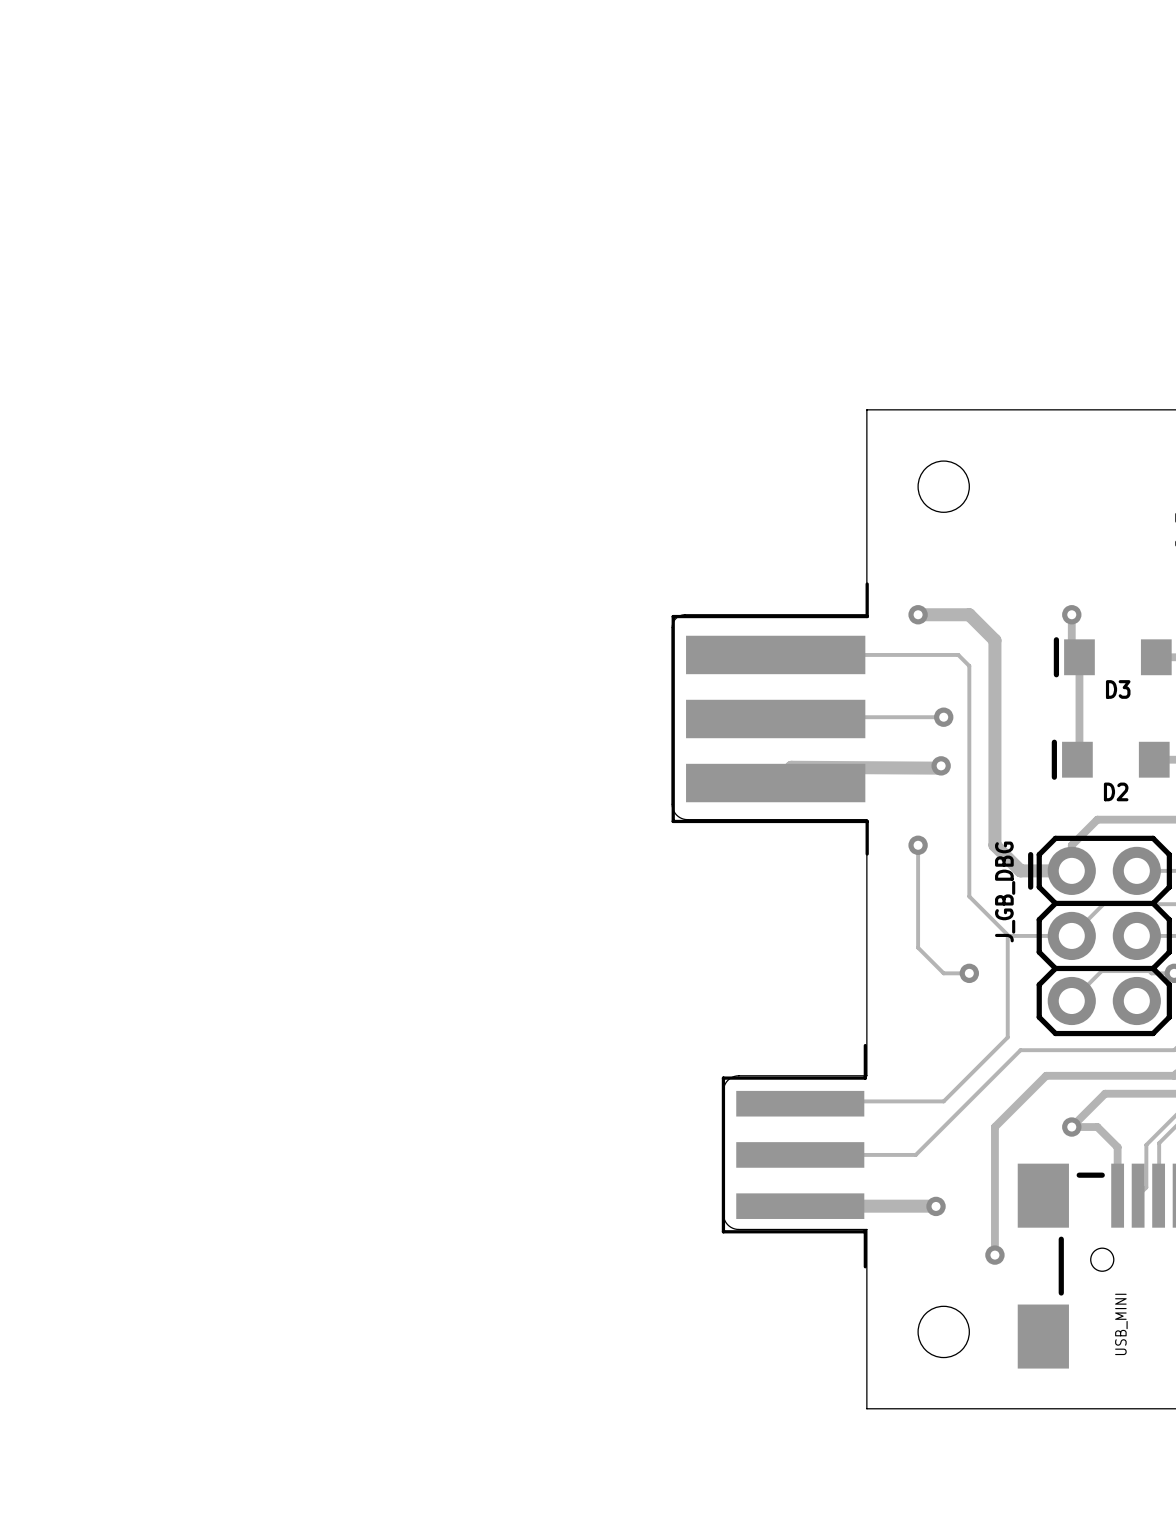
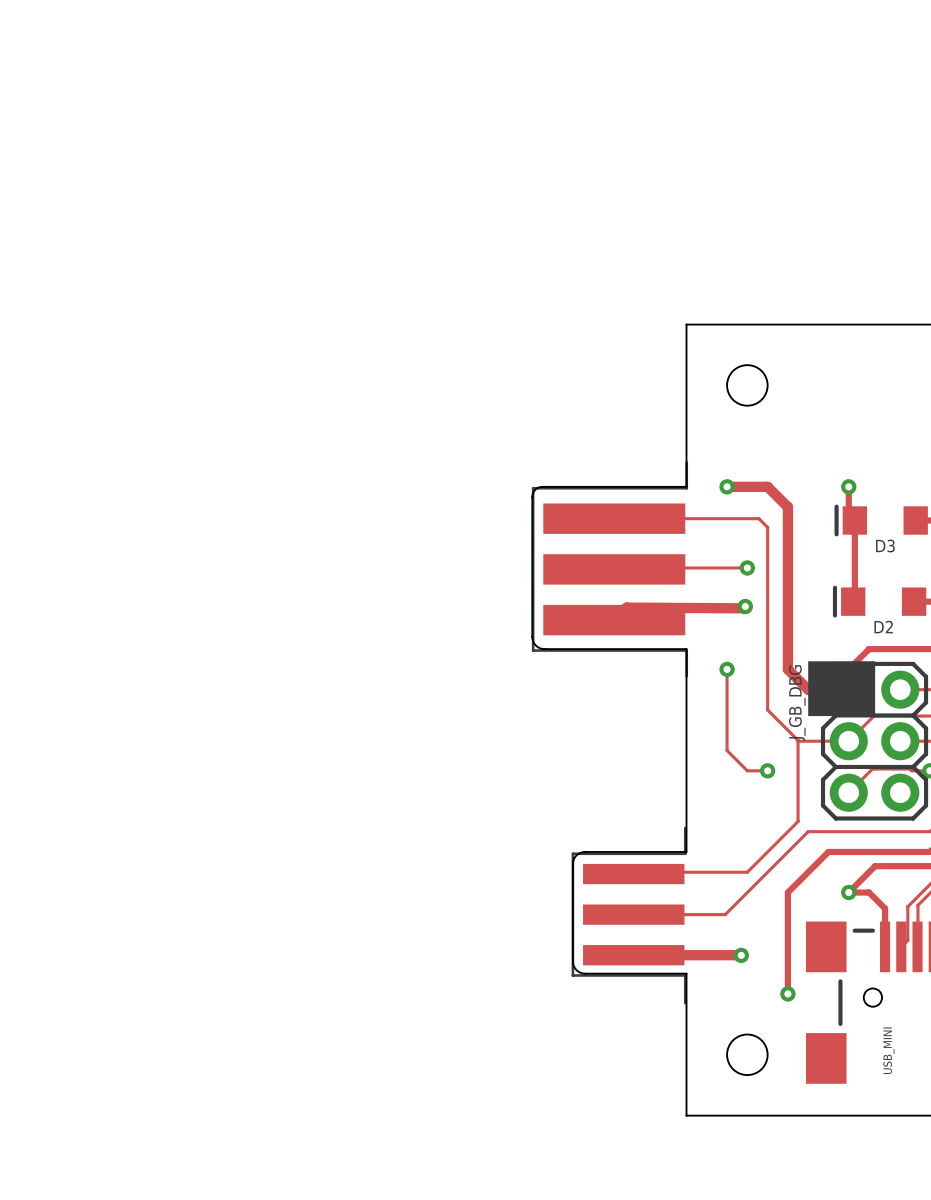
drawing: none -> [808, 661, 876, 717]

